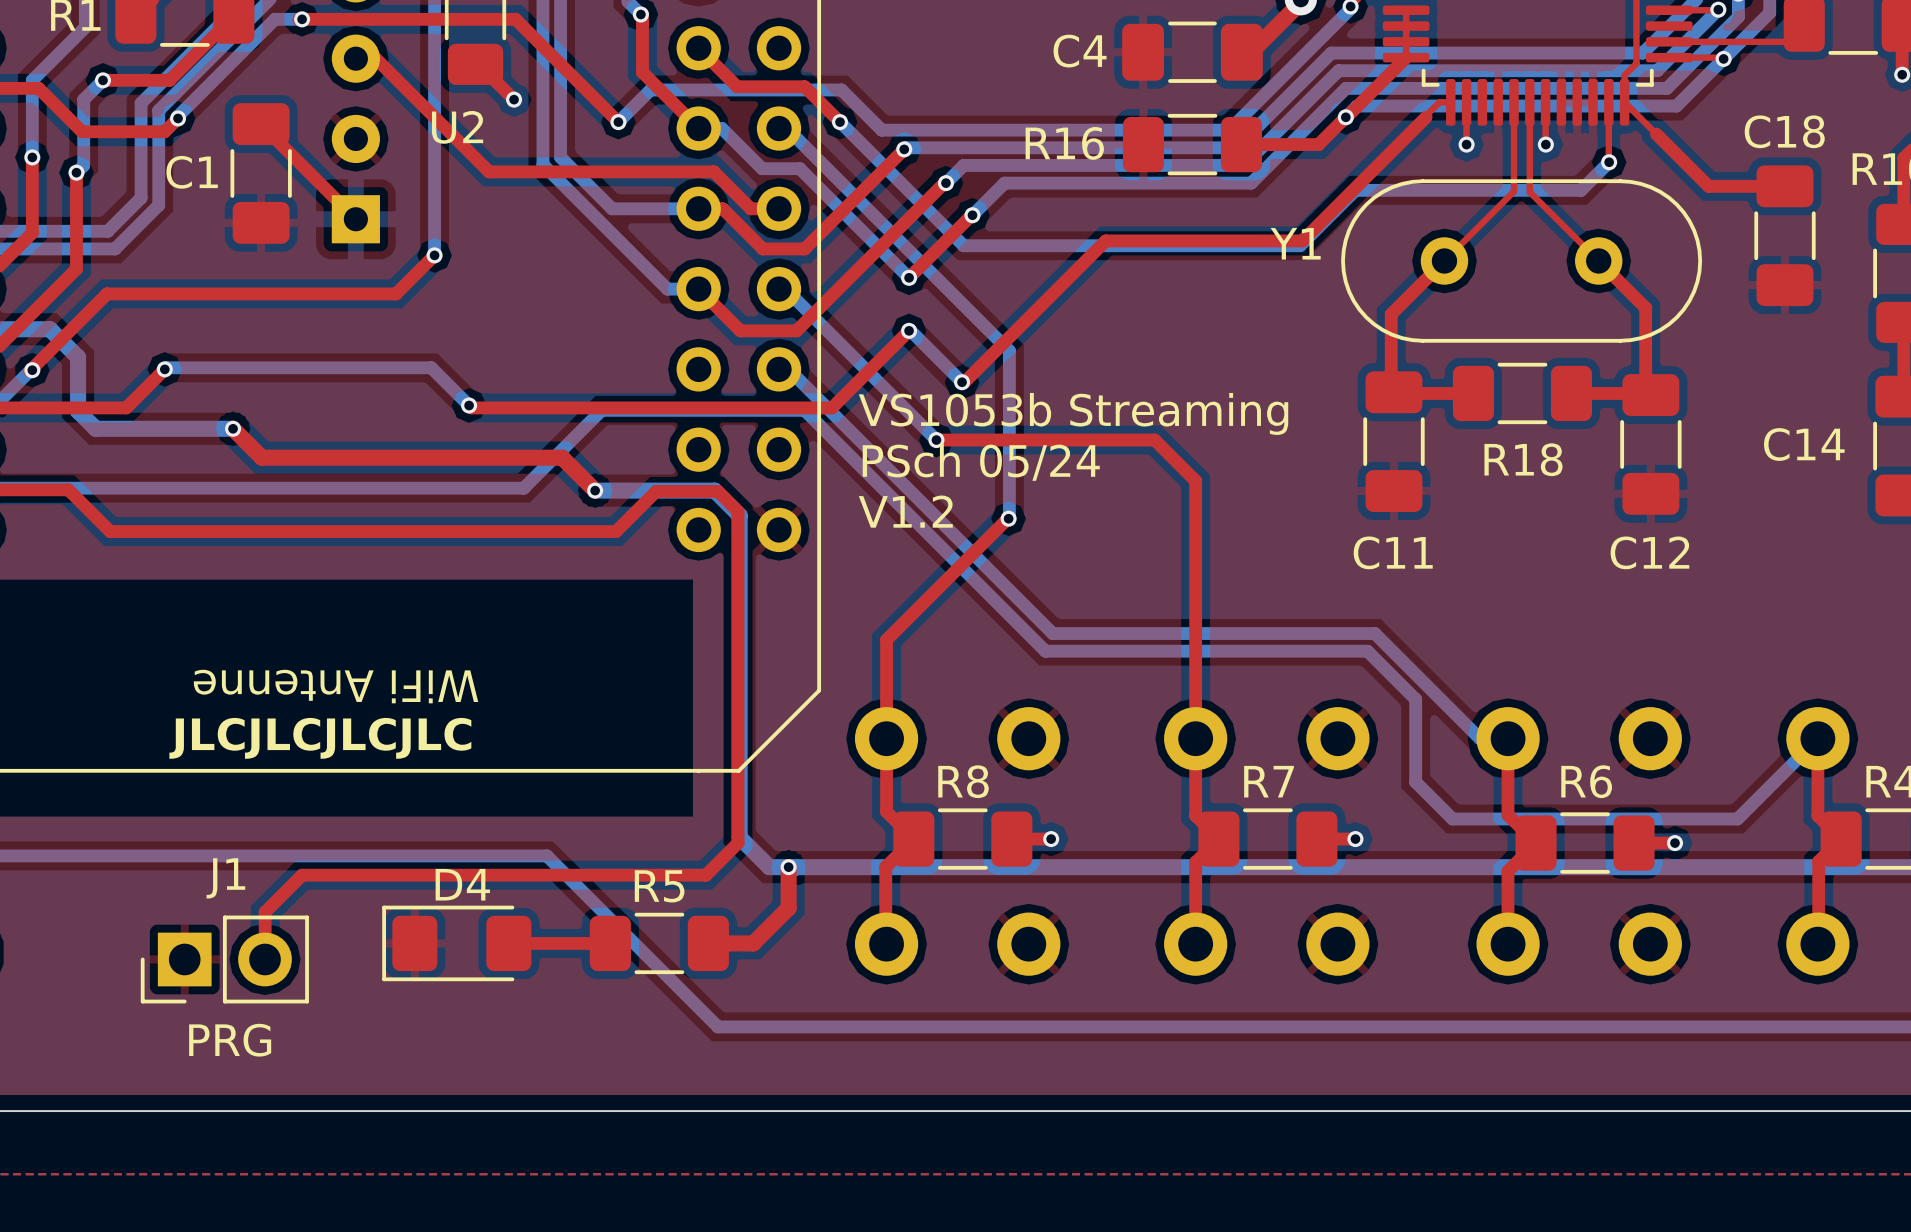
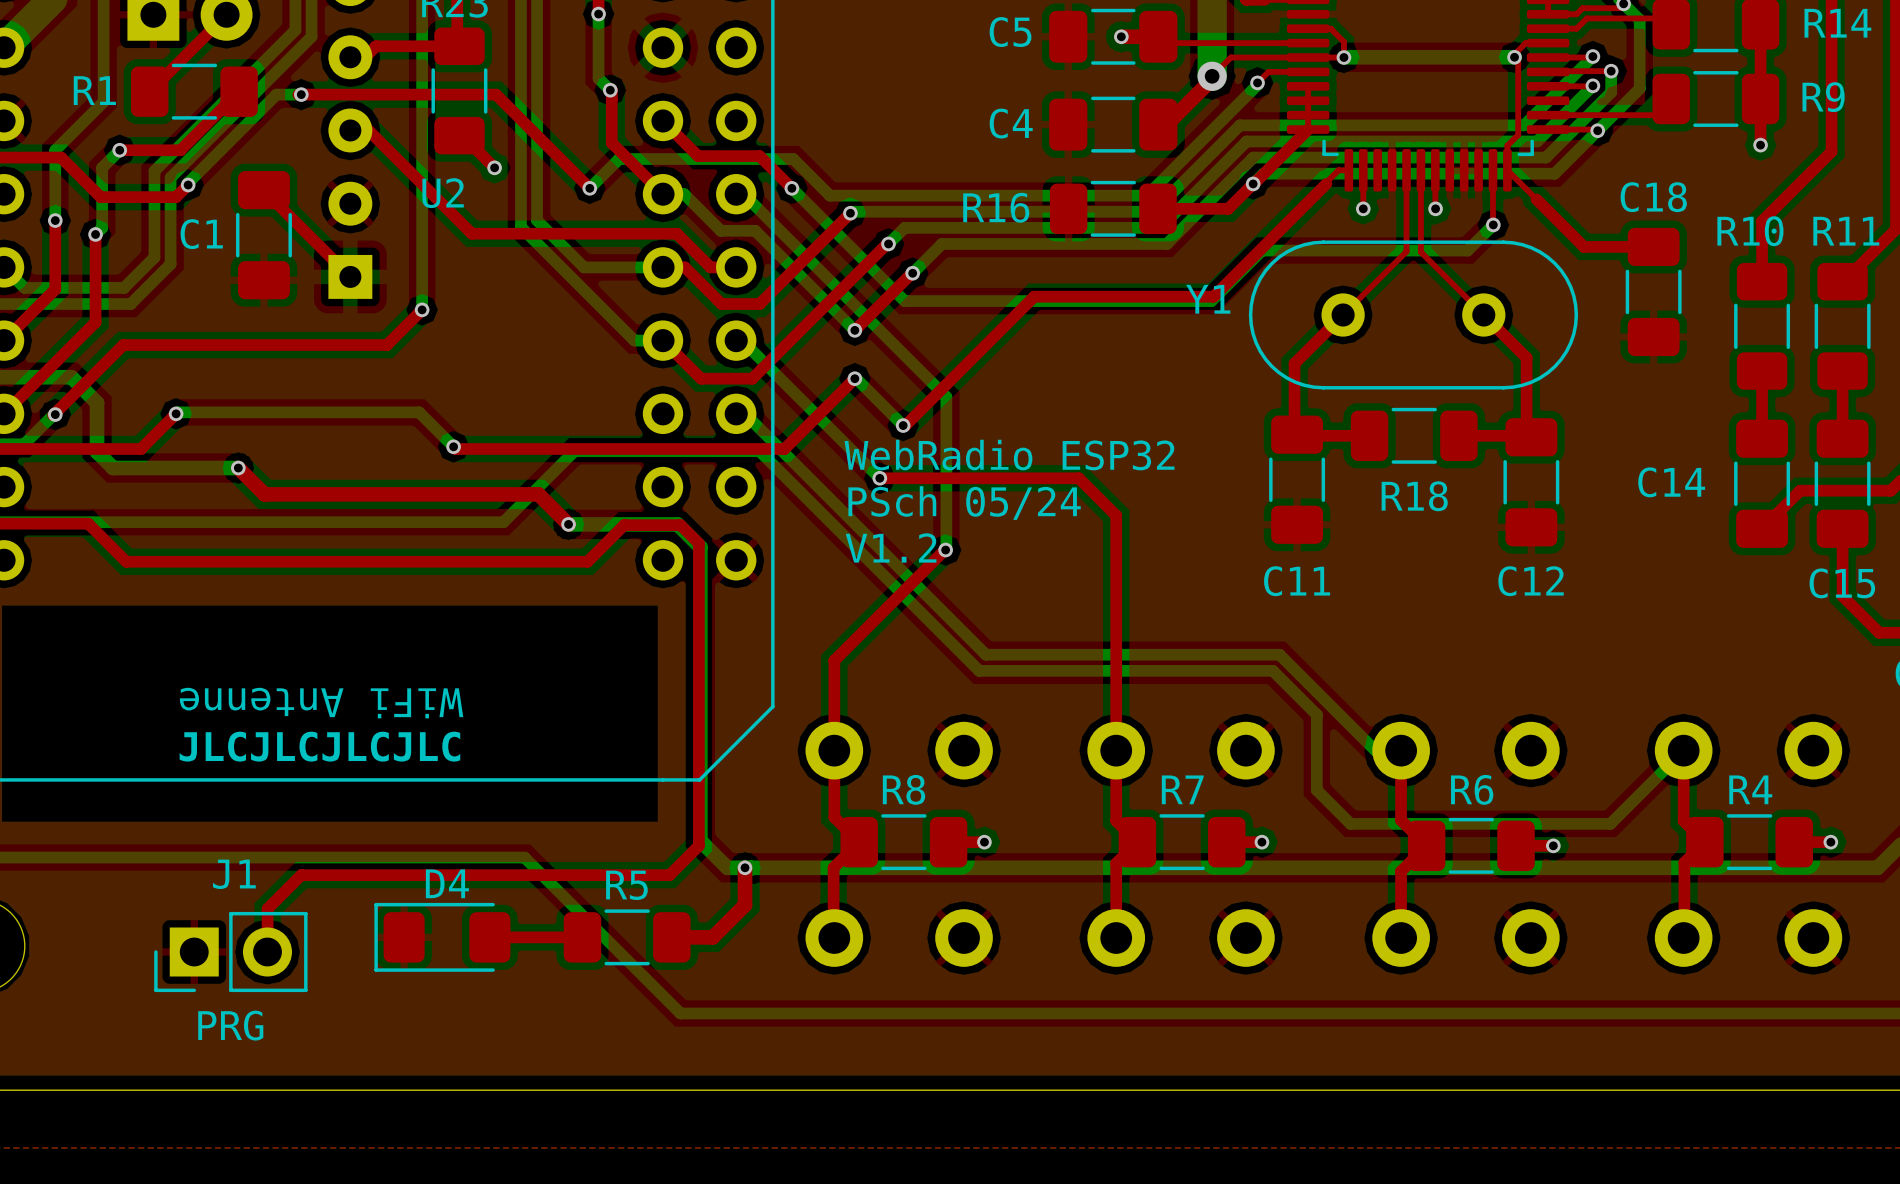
text: VS1053b Streaming (1073, 413) -> none
text: none -> WebRadio ESP32 (1009, 455)
text position: PSch 05/24 (981, 462) -> PSch 05/24 (964, 503)
text position: V1.2 (905, 511) -> V1.2 (891, 547)

